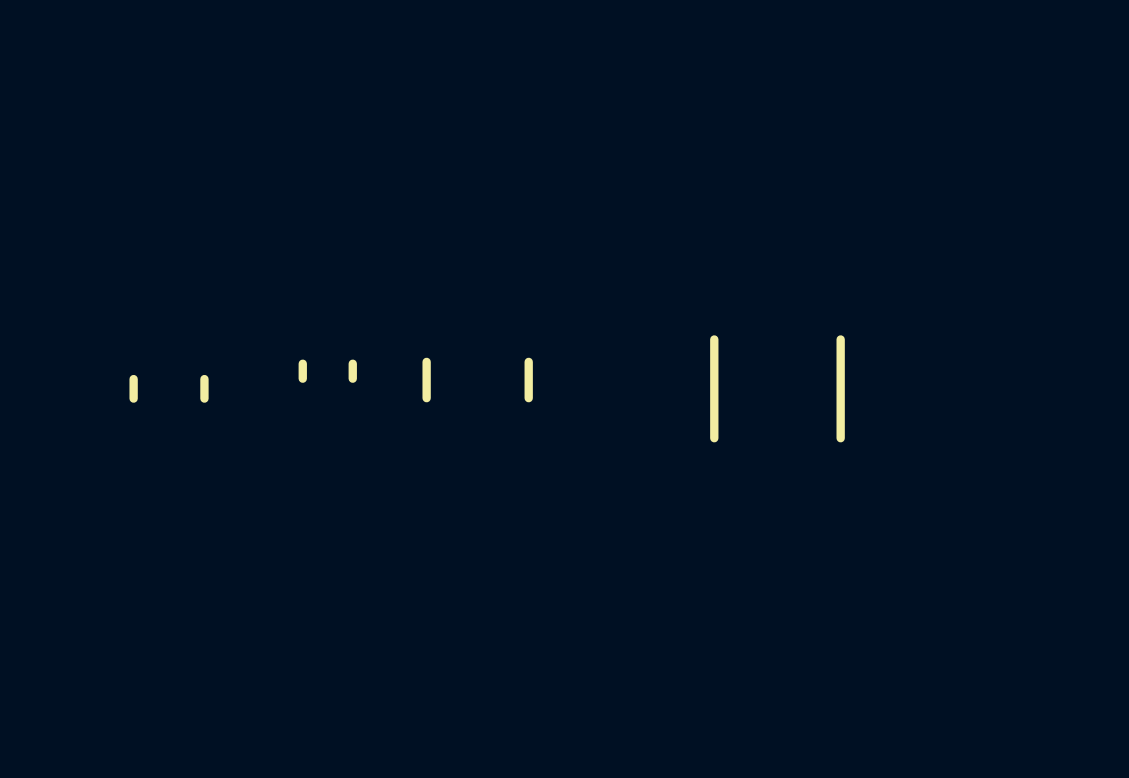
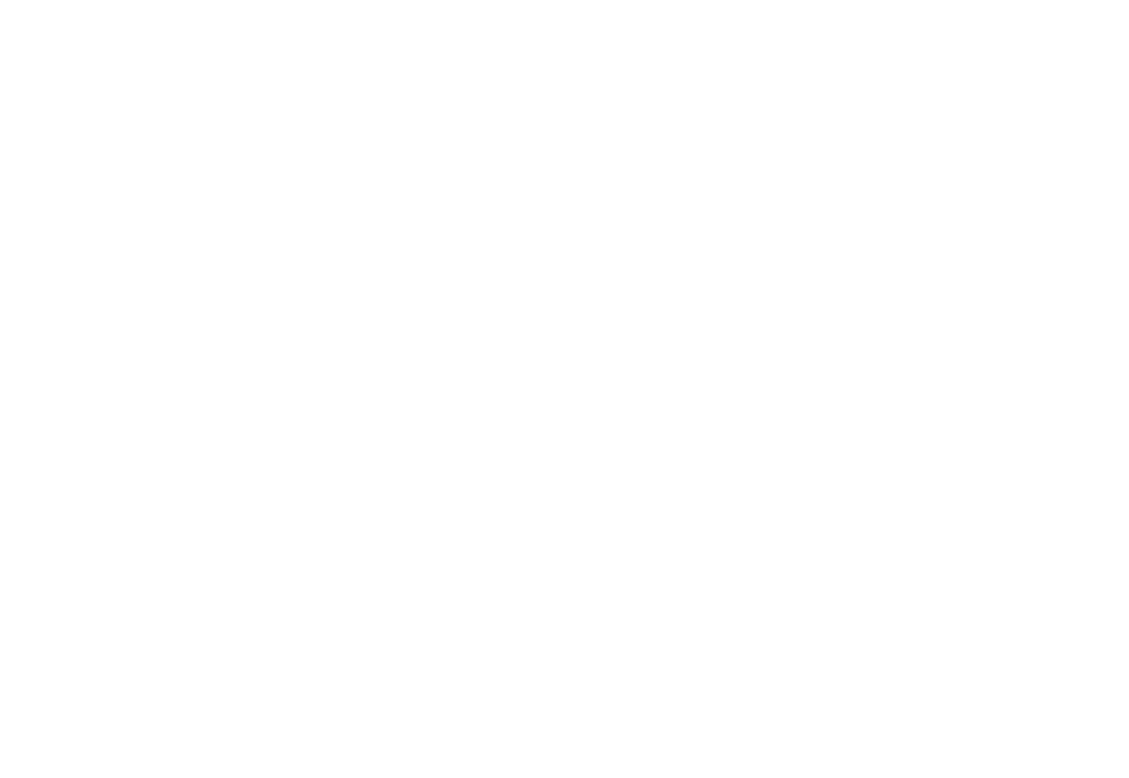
drawing: [710, 335, 845, 443] -> none
drawing: [298, 357, 533, 403] -> none
drawing: [129, 374, 209, 403] -> none

